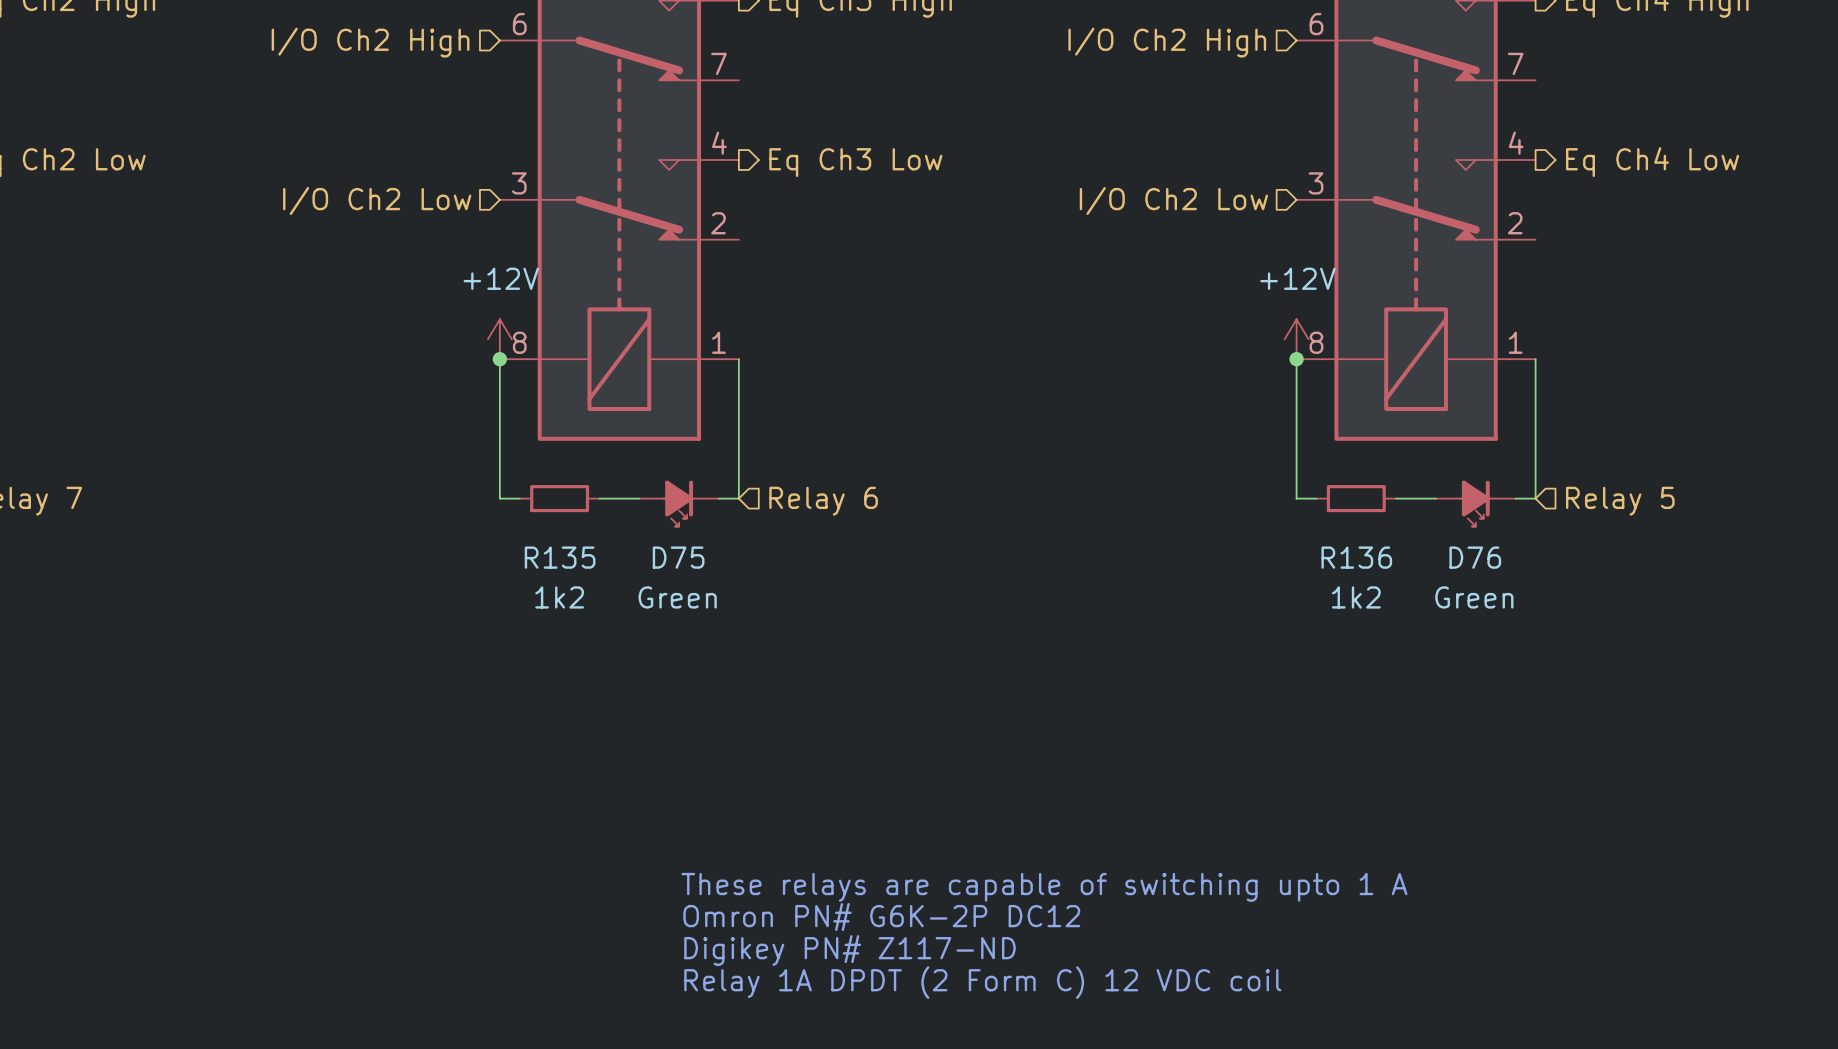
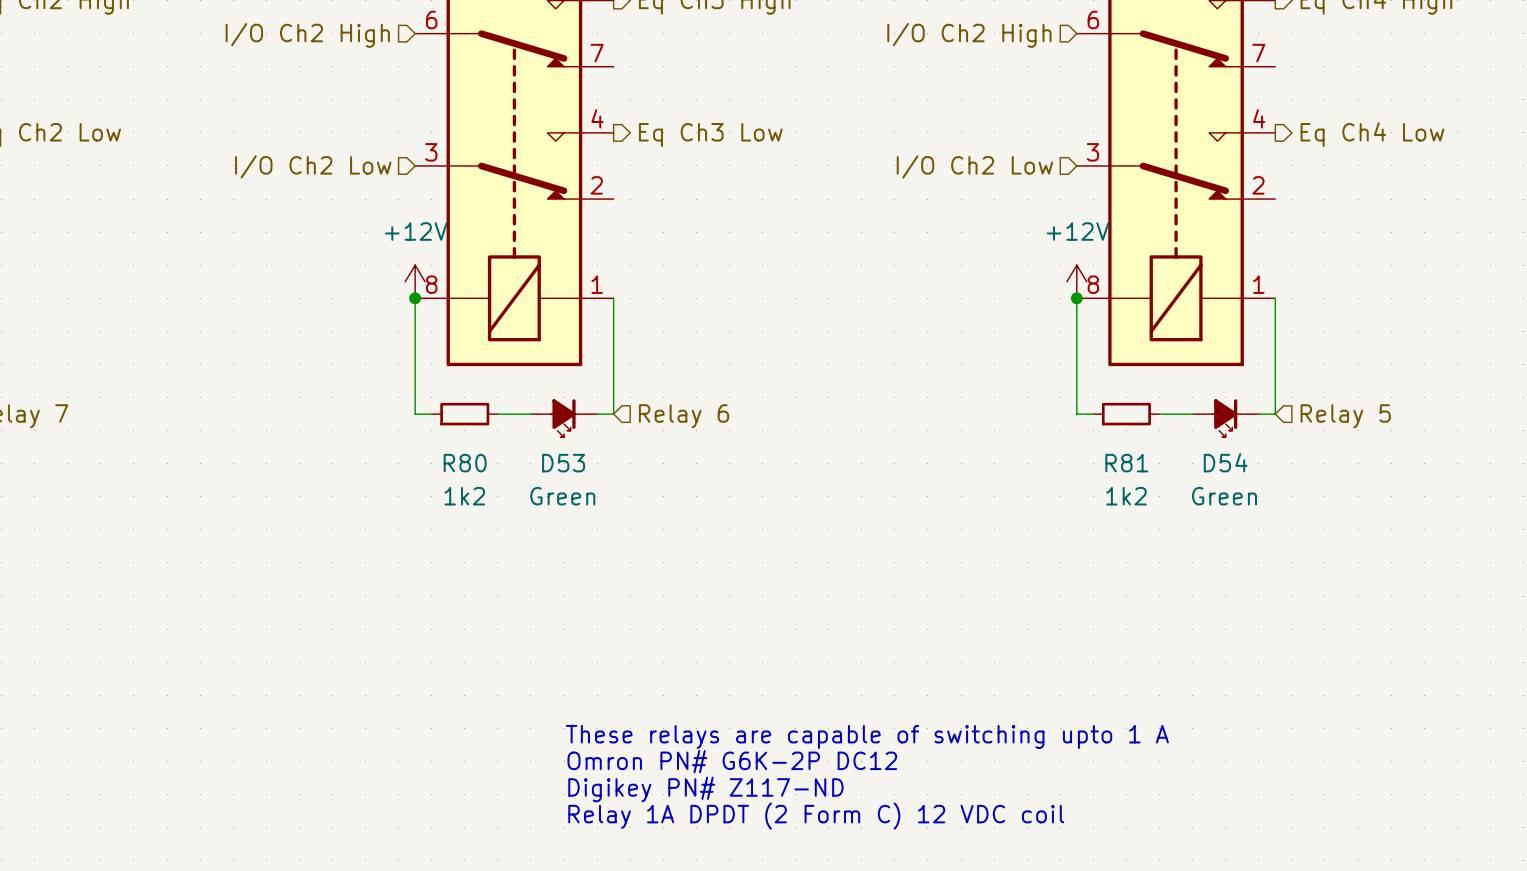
R135 name: R135 (560, 557) -> R80 (465, 463)
D75 name: D75 (678, 557) -> D53 (563, 463)
R136 name: R136 (1356, 557) -> R81 (1126, 463)
D76 name: D76 (1475, 557) -> D54 (1225, 462)

